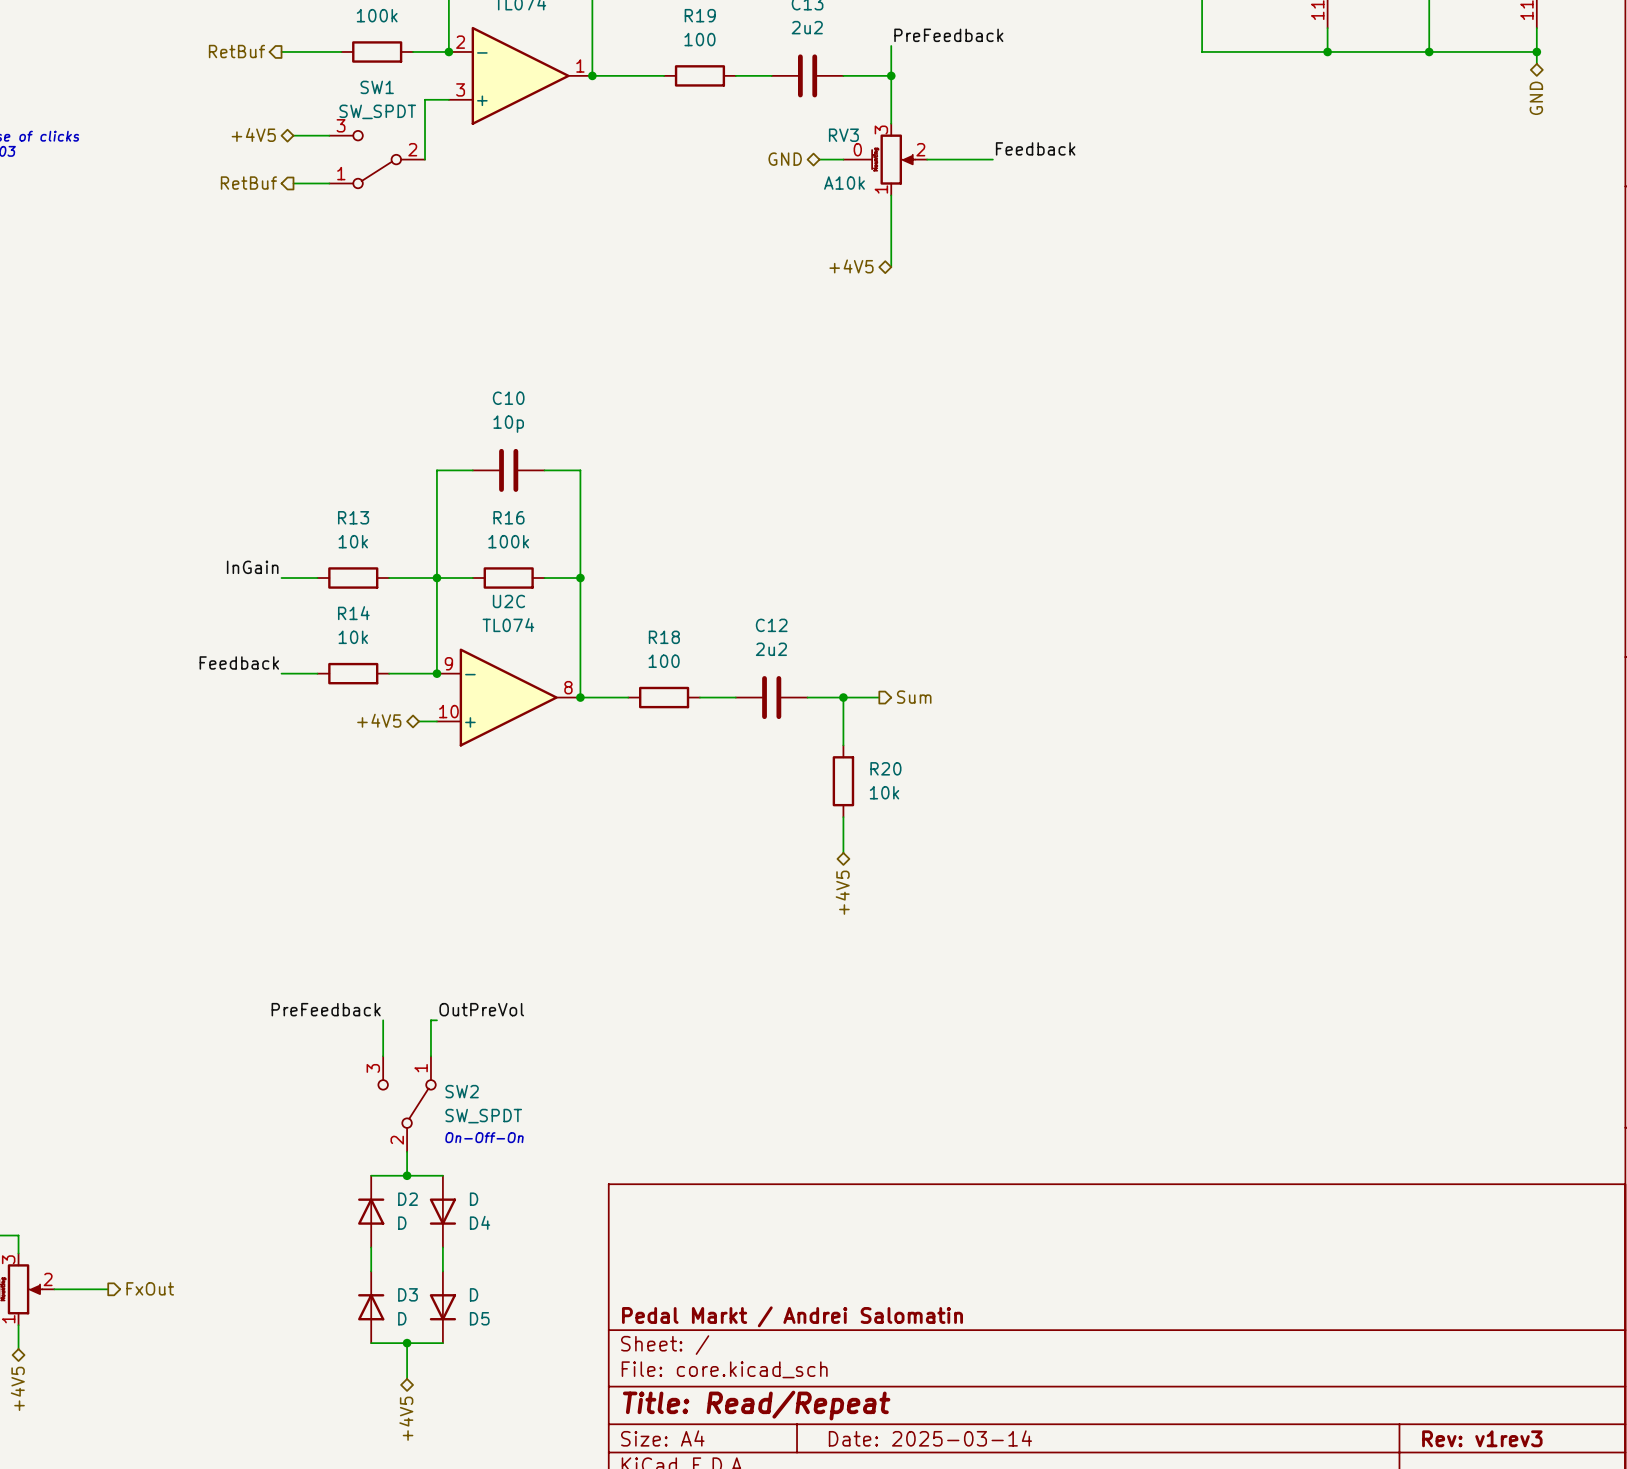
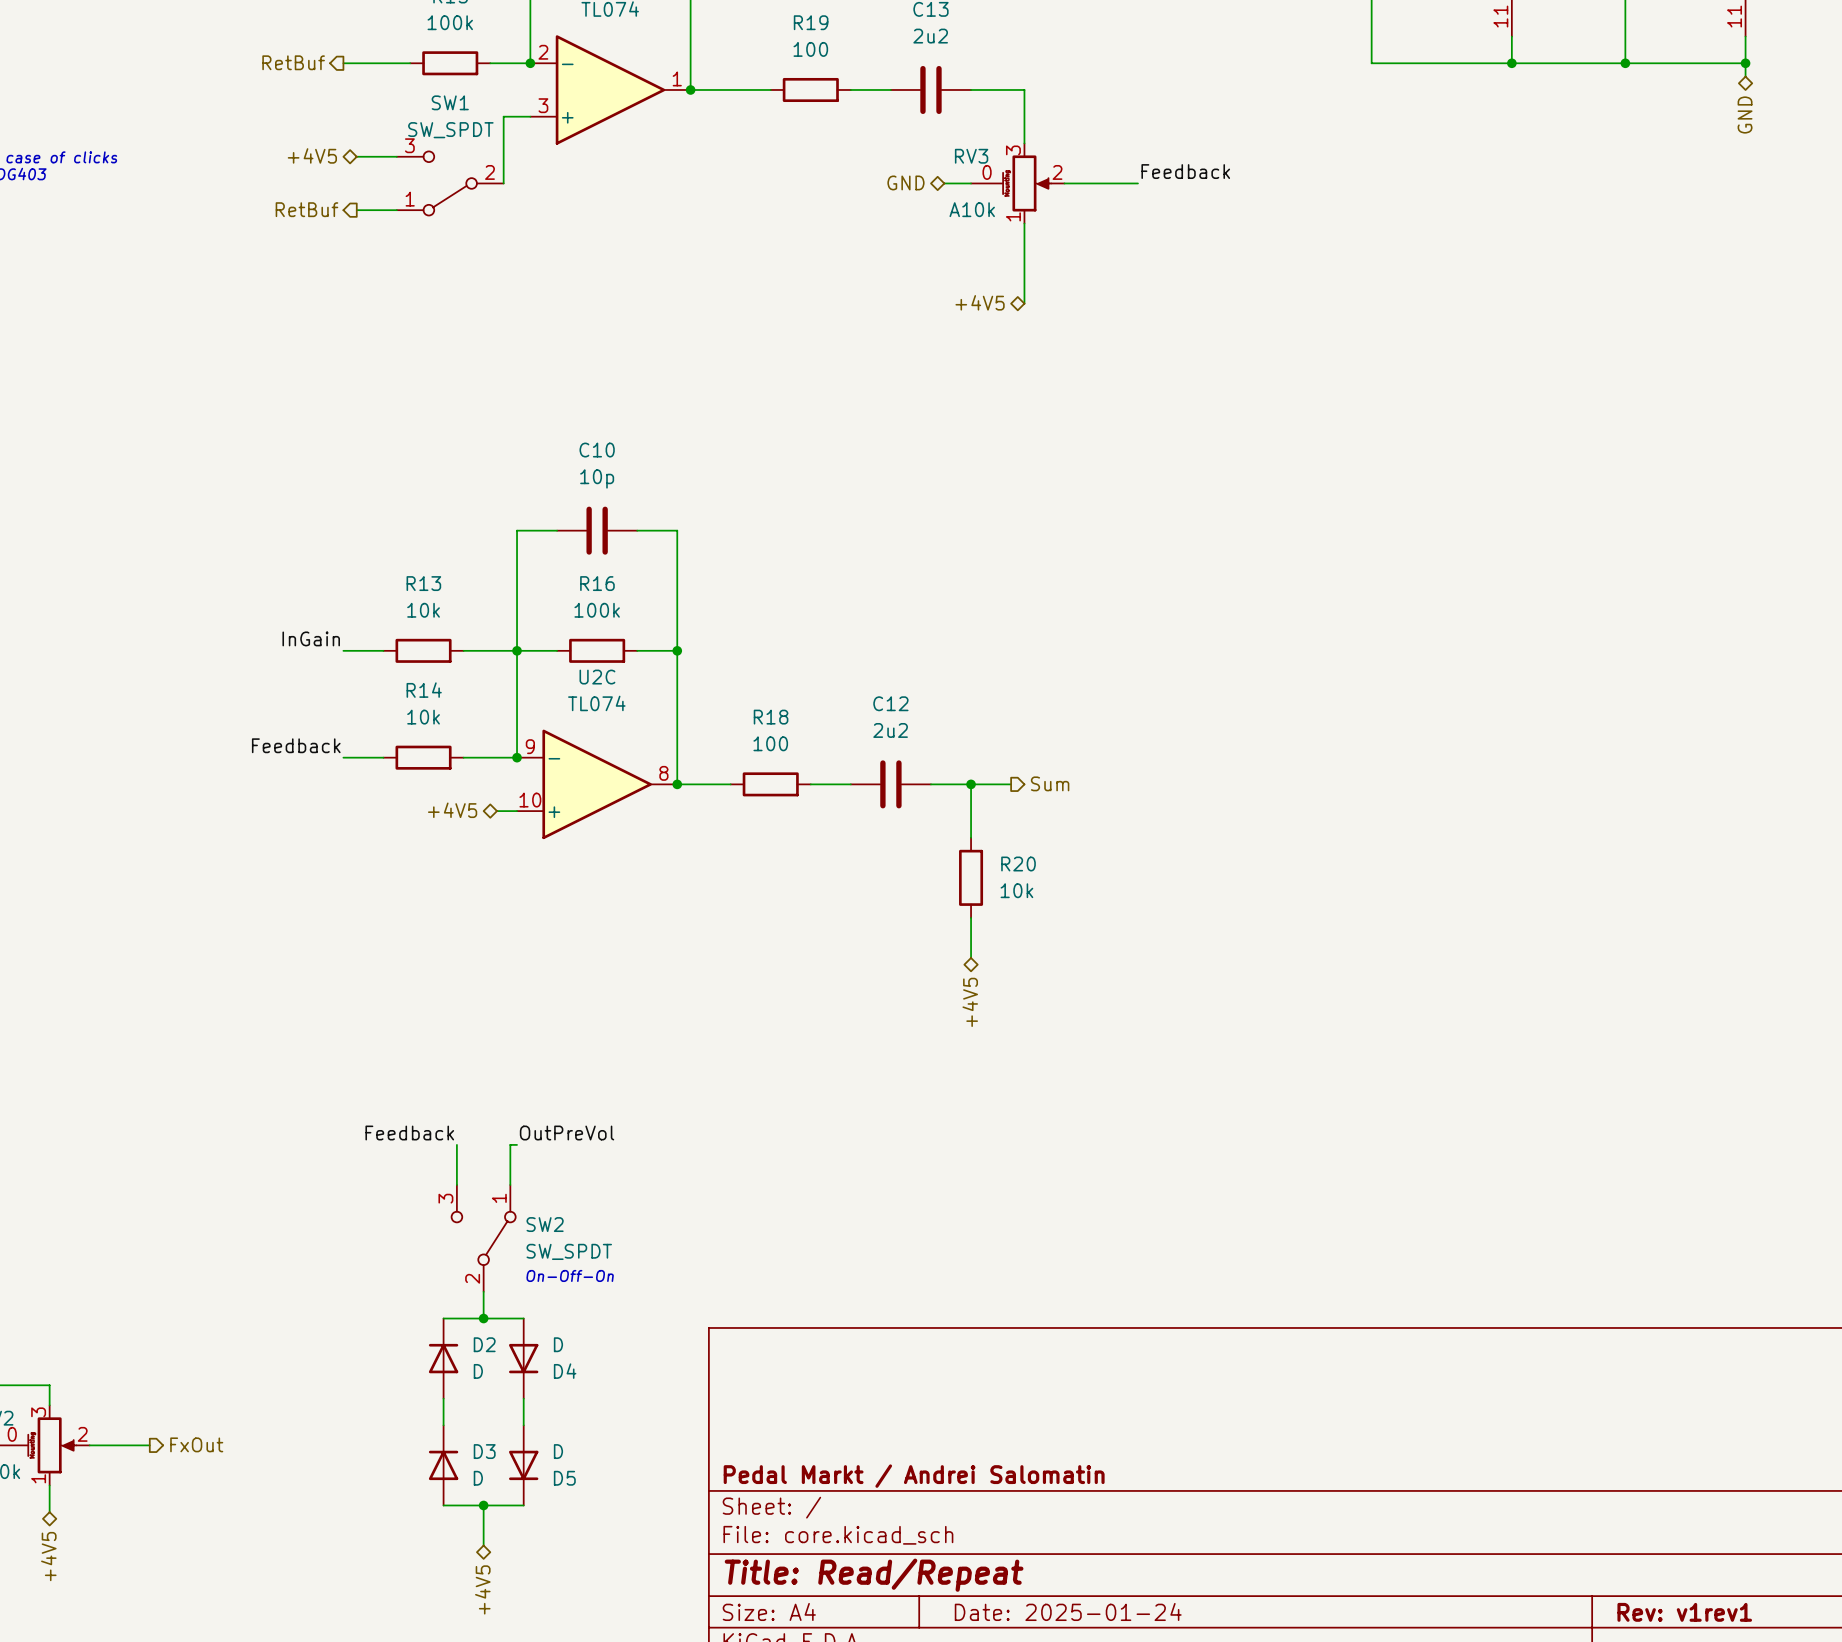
label: PreFeedback (948, 35) -> none
wire: (891, 46) (891, 75) -> none
junction: (891, 75) -> none
label: PreFeedback (326, 1009) -> Feedback (409, 1133)
title block: Date: 2025-03-14 (930, 1438) -> Date: 2025-01-24 (1068, 1611)
title block: Rev: v1rev3 (1482, 1438) -> Rev: v1rev1 (1684, 1612)

